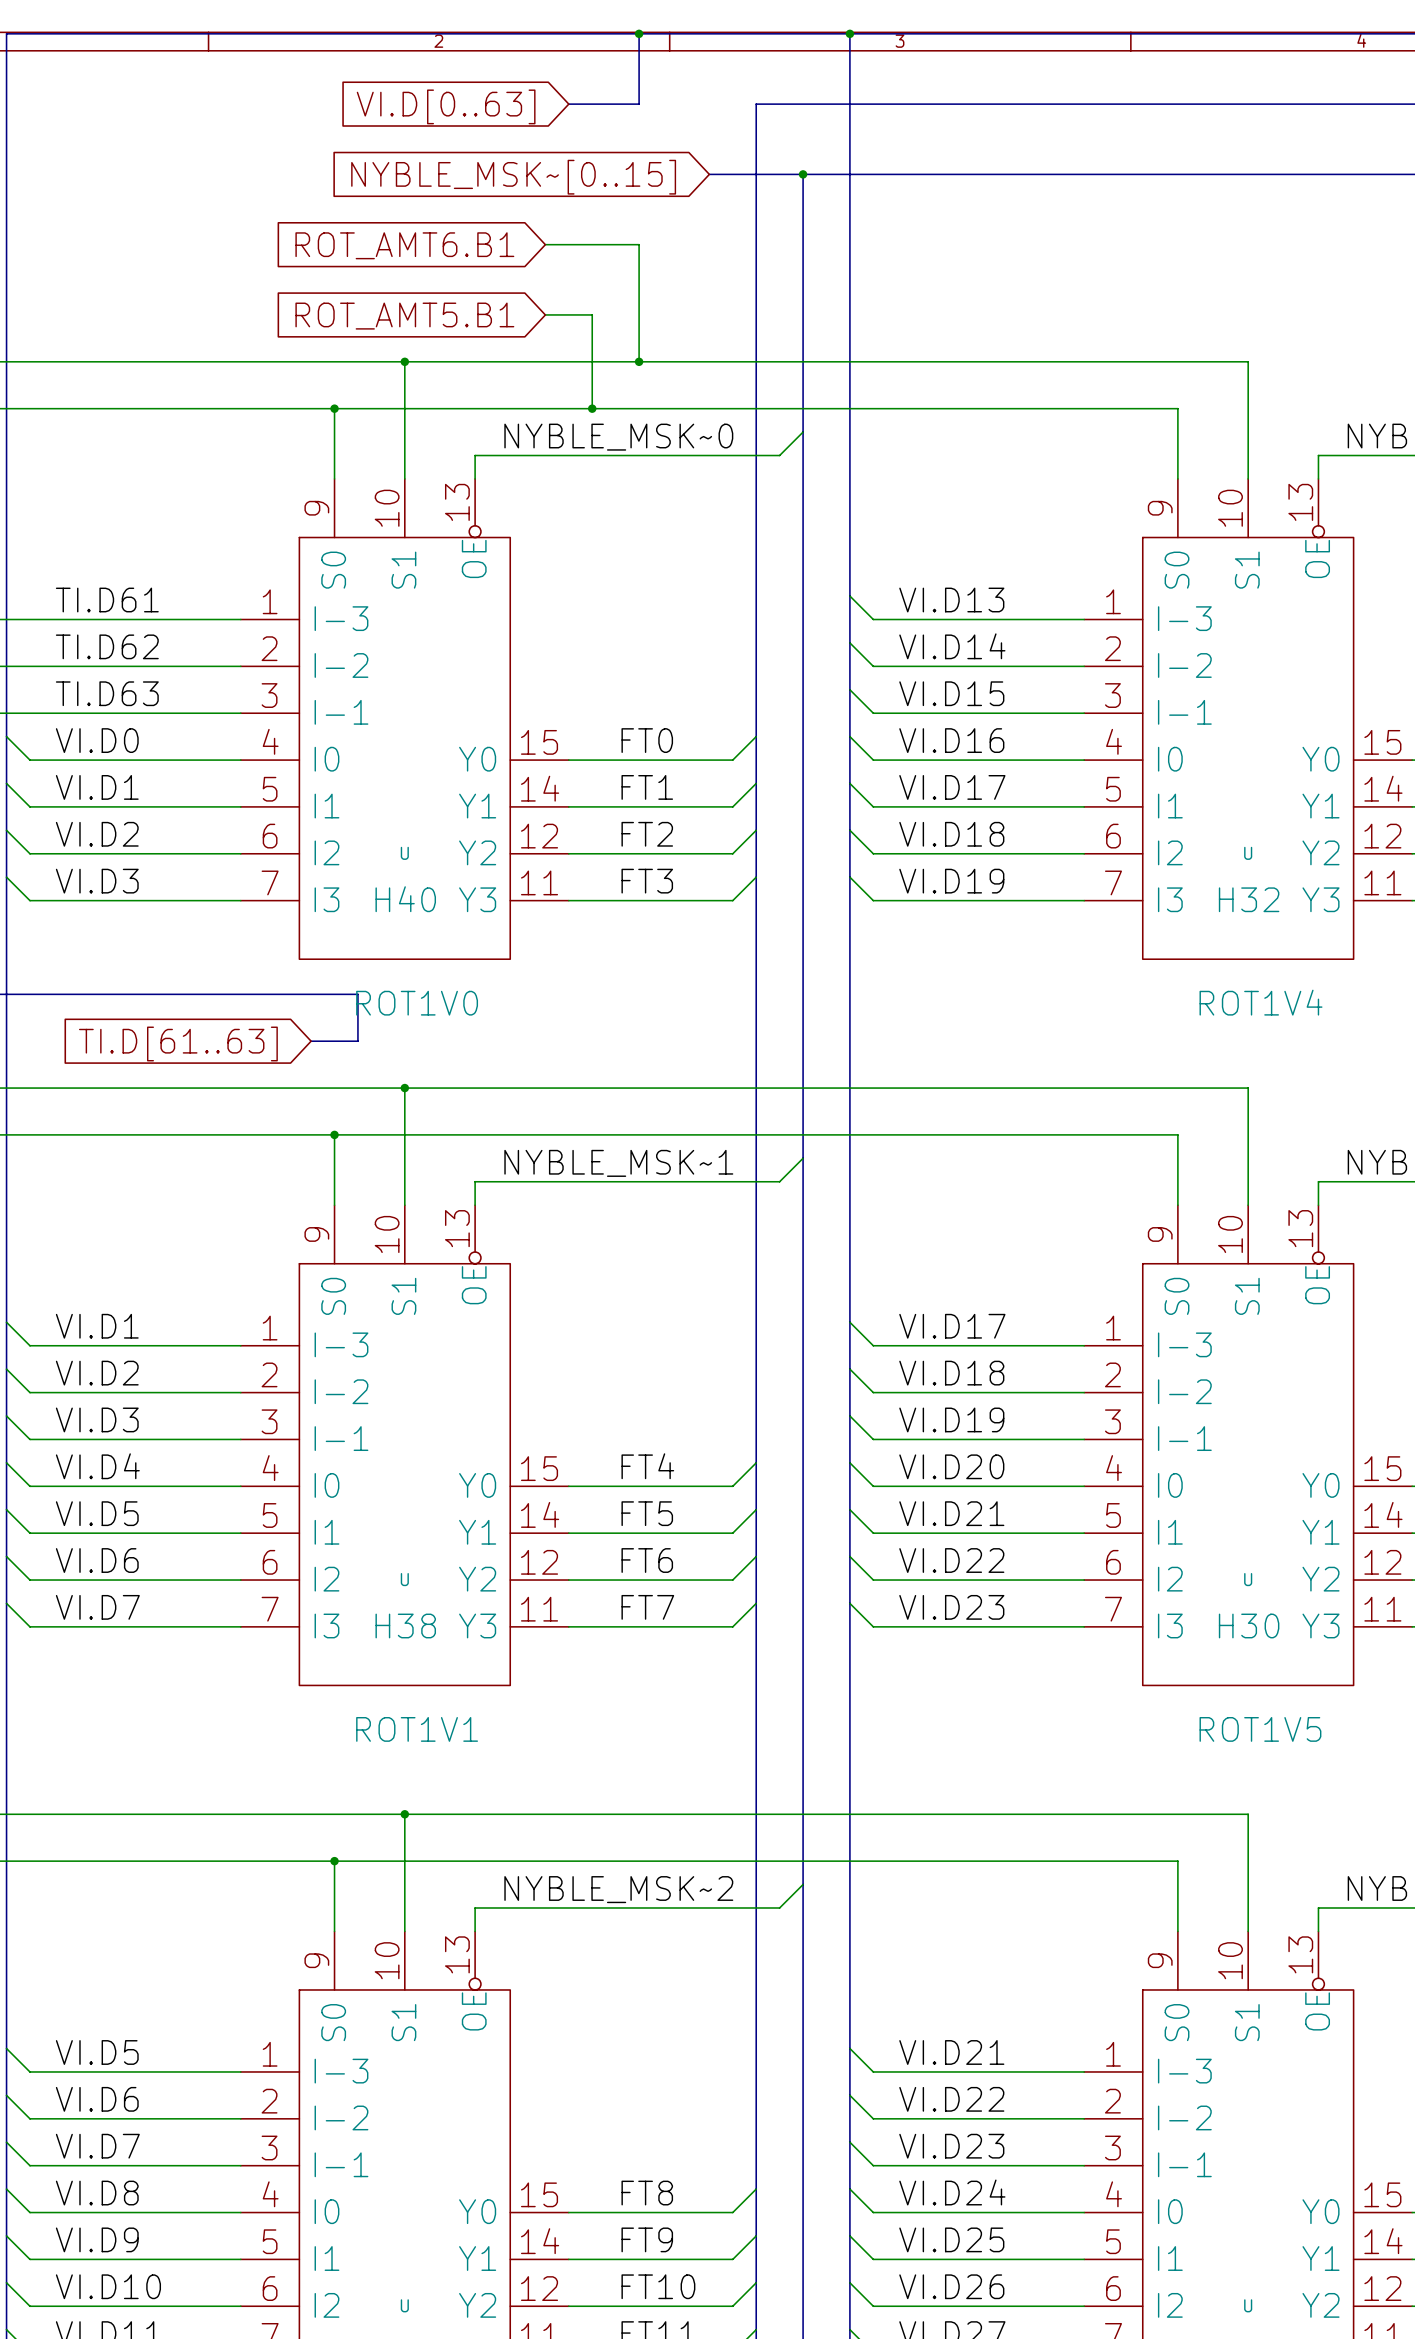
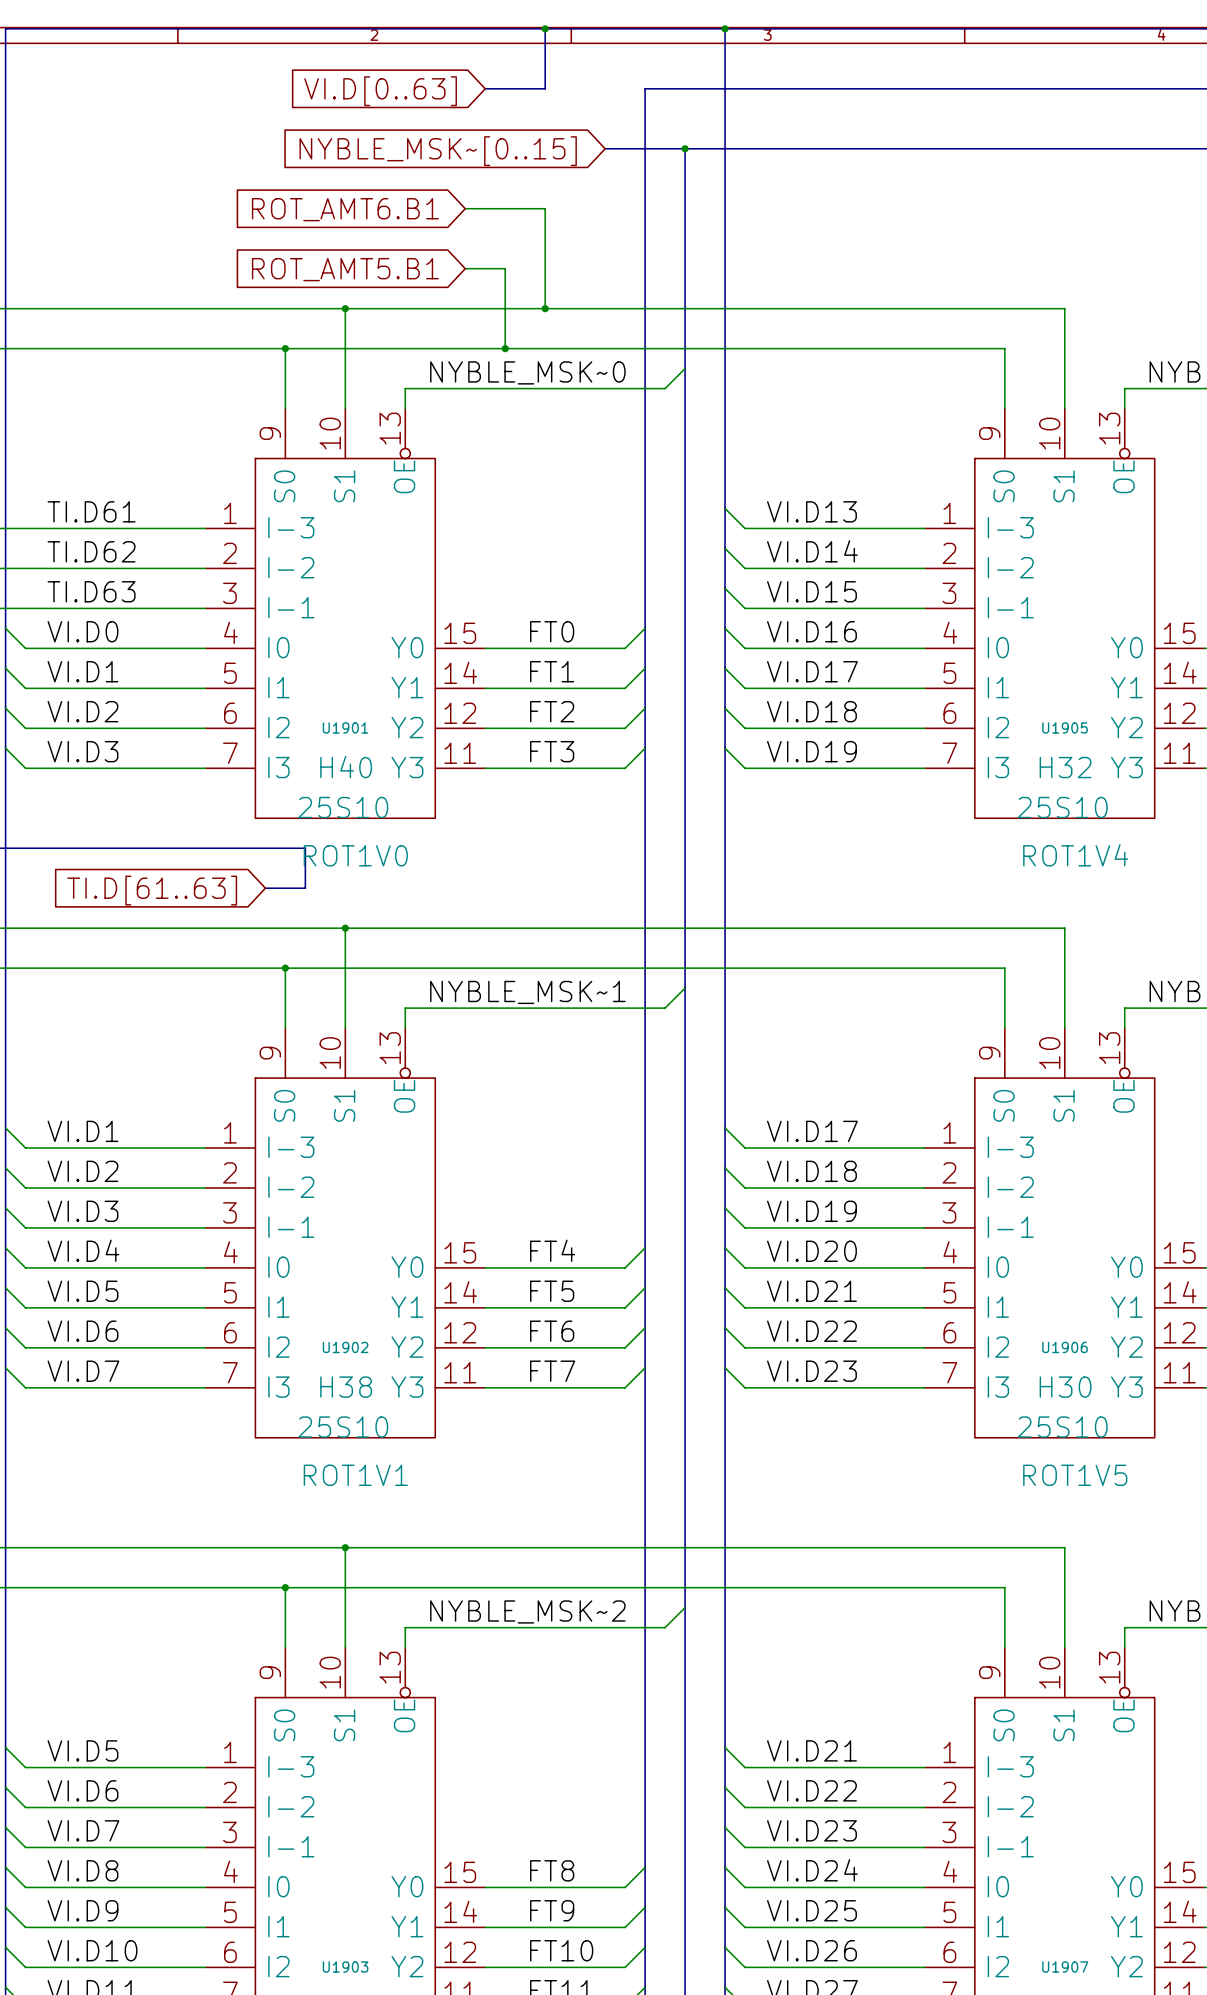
U name: U (404, 853) -> U1901 (345, 727)
U name: U (1248, 853) -> U1905 (1065, 727)
U value: none -> 25S10 (343, 807)
U value: none -> 25S10 (1062, 807)
U name: U (404, 1579) -> U1902 (345, 1347)
U name: U (1248, 1579) -> U1906 (1065, 1347)
U value: none -> 25S10 (343, 1427)
U value: none -> 25S10 (1062, 1427)
U name: U (404, 2305) -> U1903 (345, 1967)
U name: U (1248, 2305) -> U1907 (1065, 1967)

